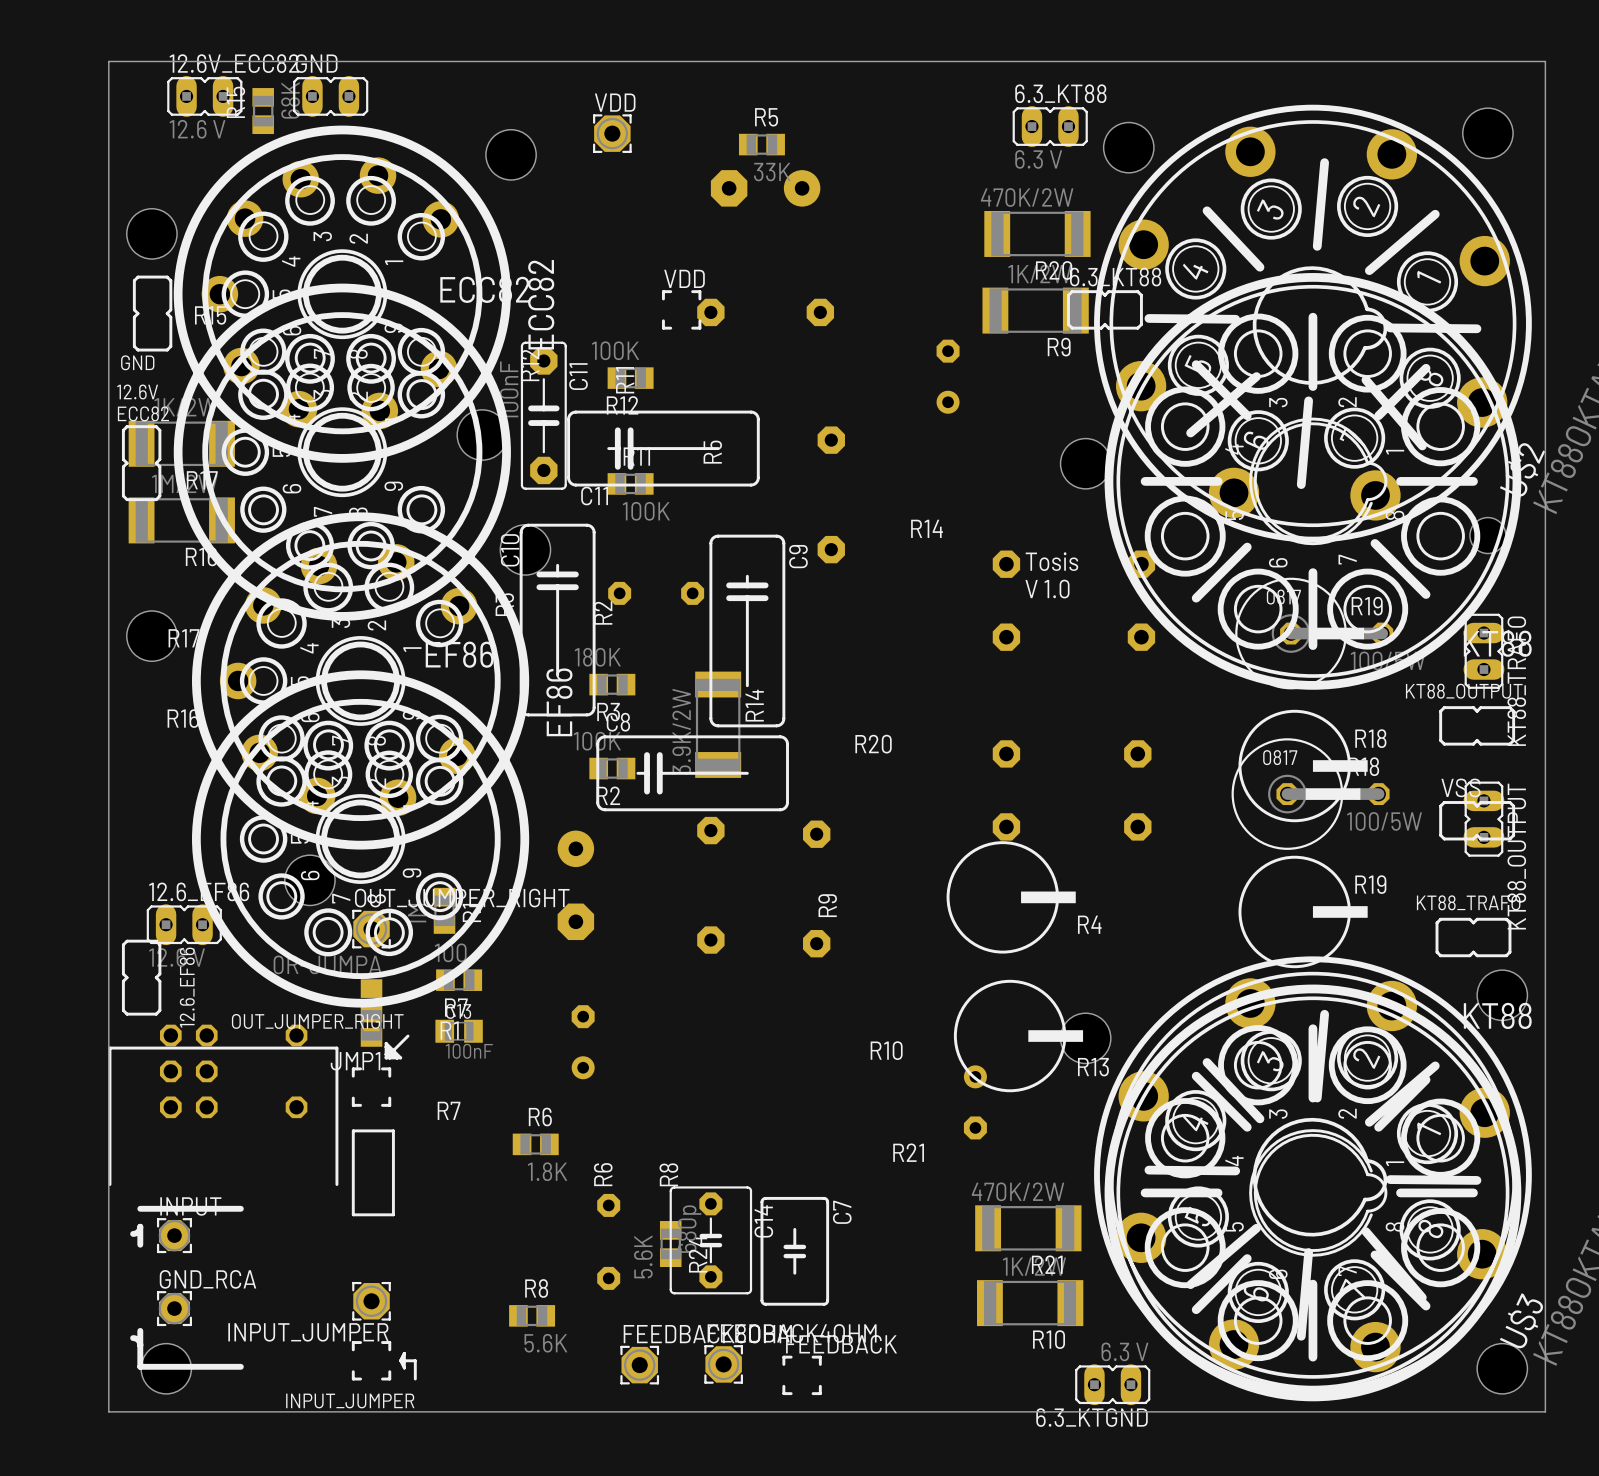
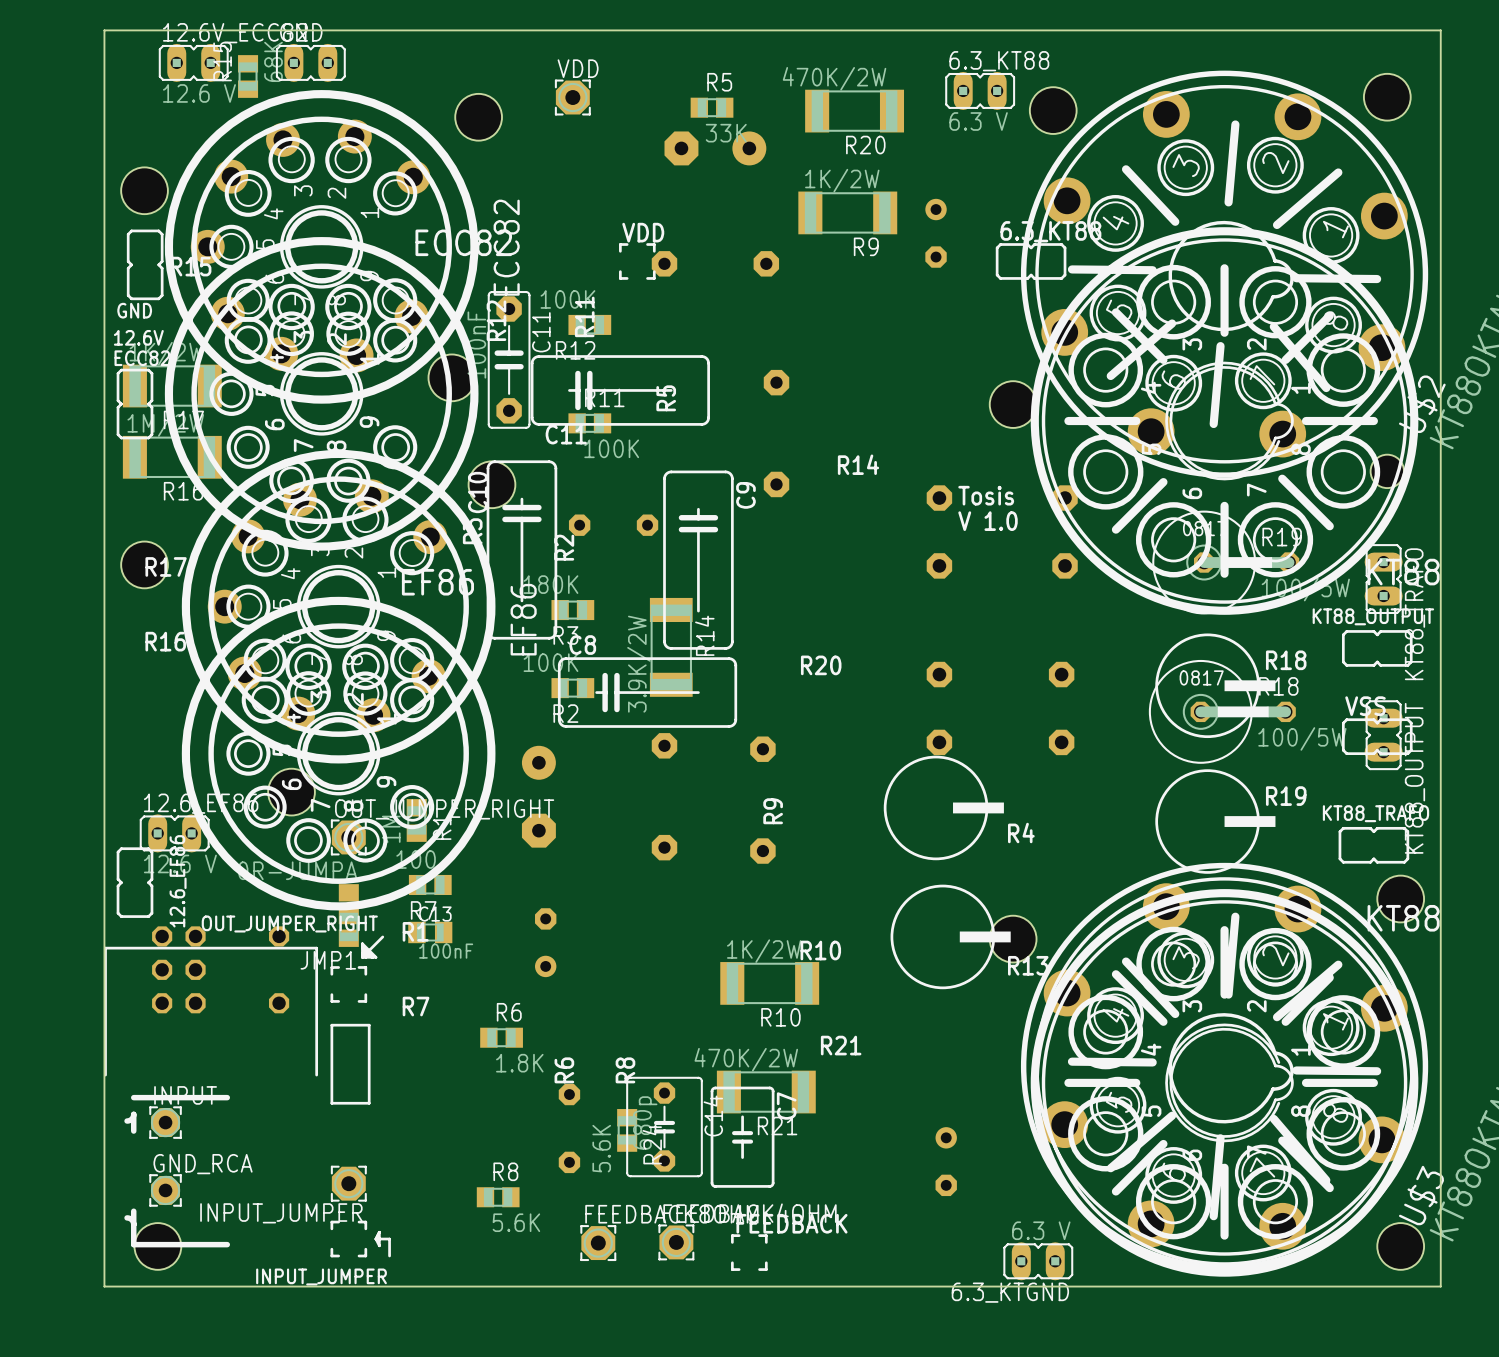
R20 position: (1037, 233) -> (854, 111)
R9 position: (1035, 310) -> (847, 212)
part rotation: 0° (948, 376) -> 180° (936, 233)
part position: (948, 376) -> (936, 233)
part position: (975, 1102) -> (946, 1161)
R21 position: (1028, 1228) -> (766, 1092)
R10 position: (1030, 1303) -> (769, 983)

